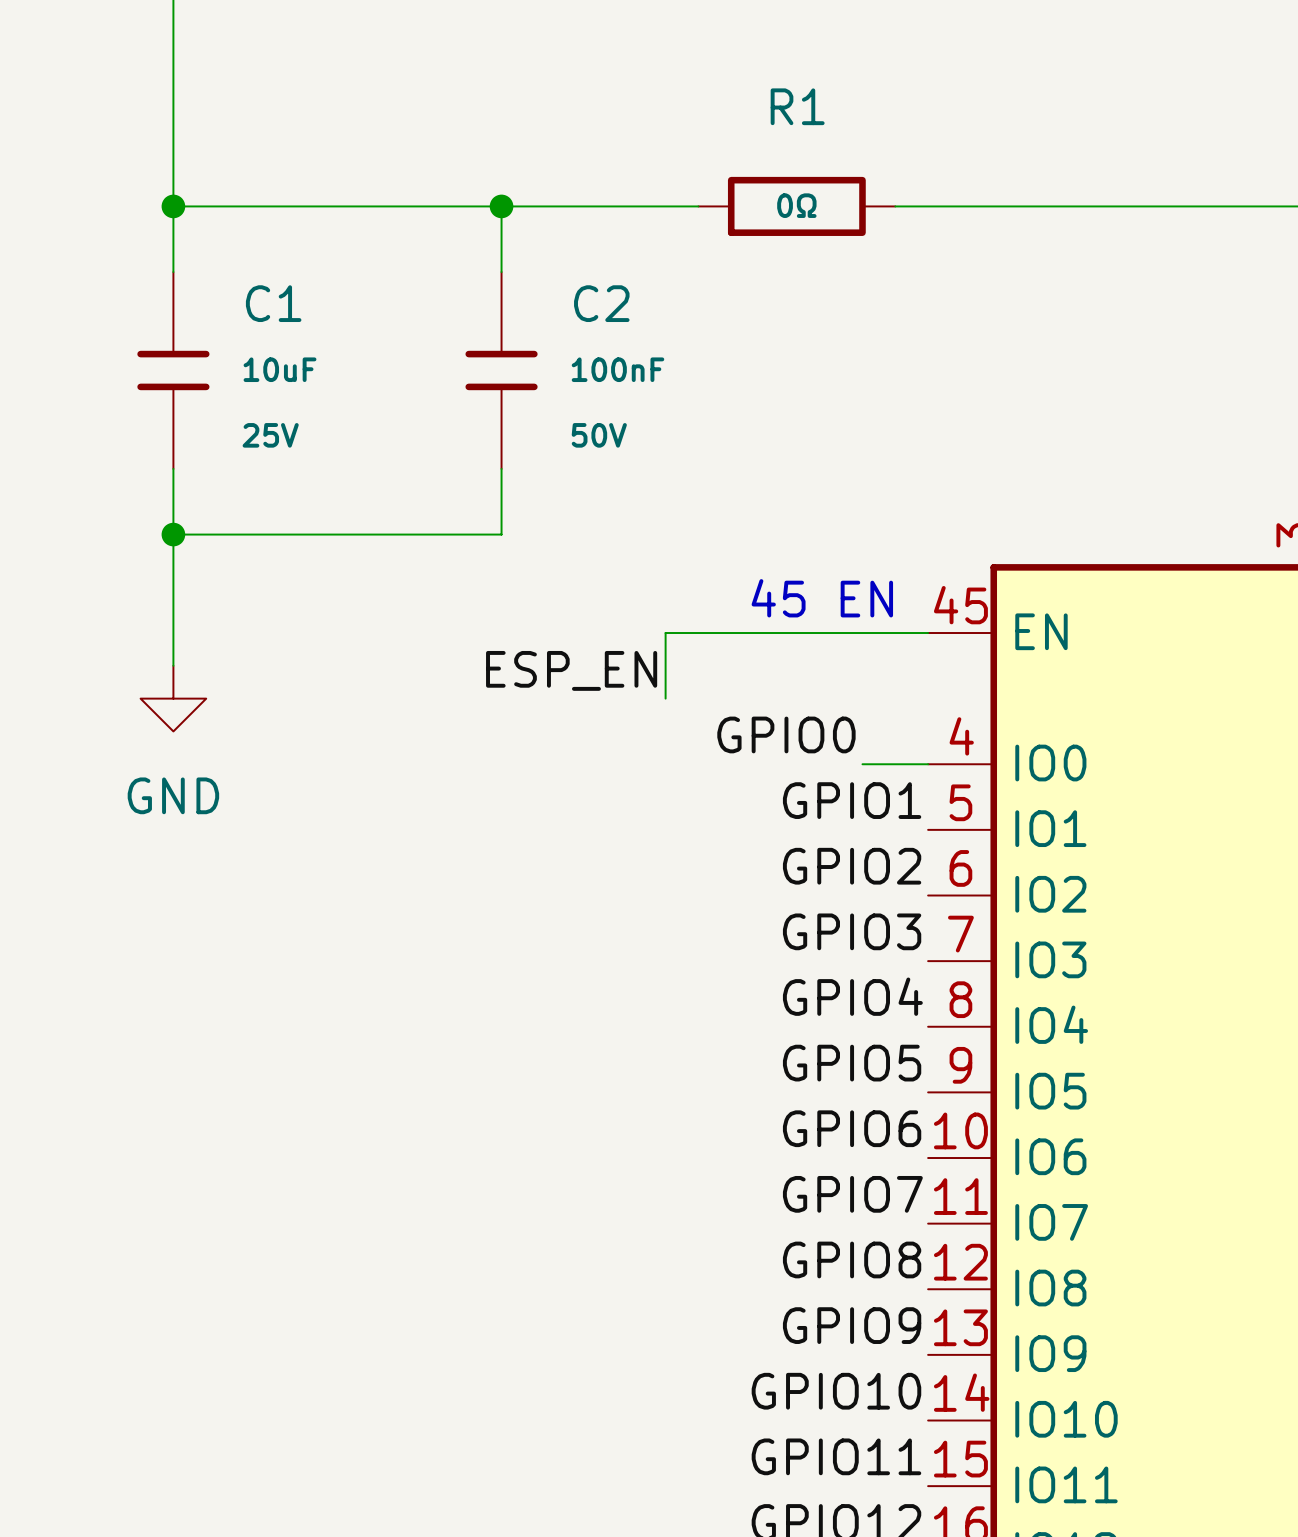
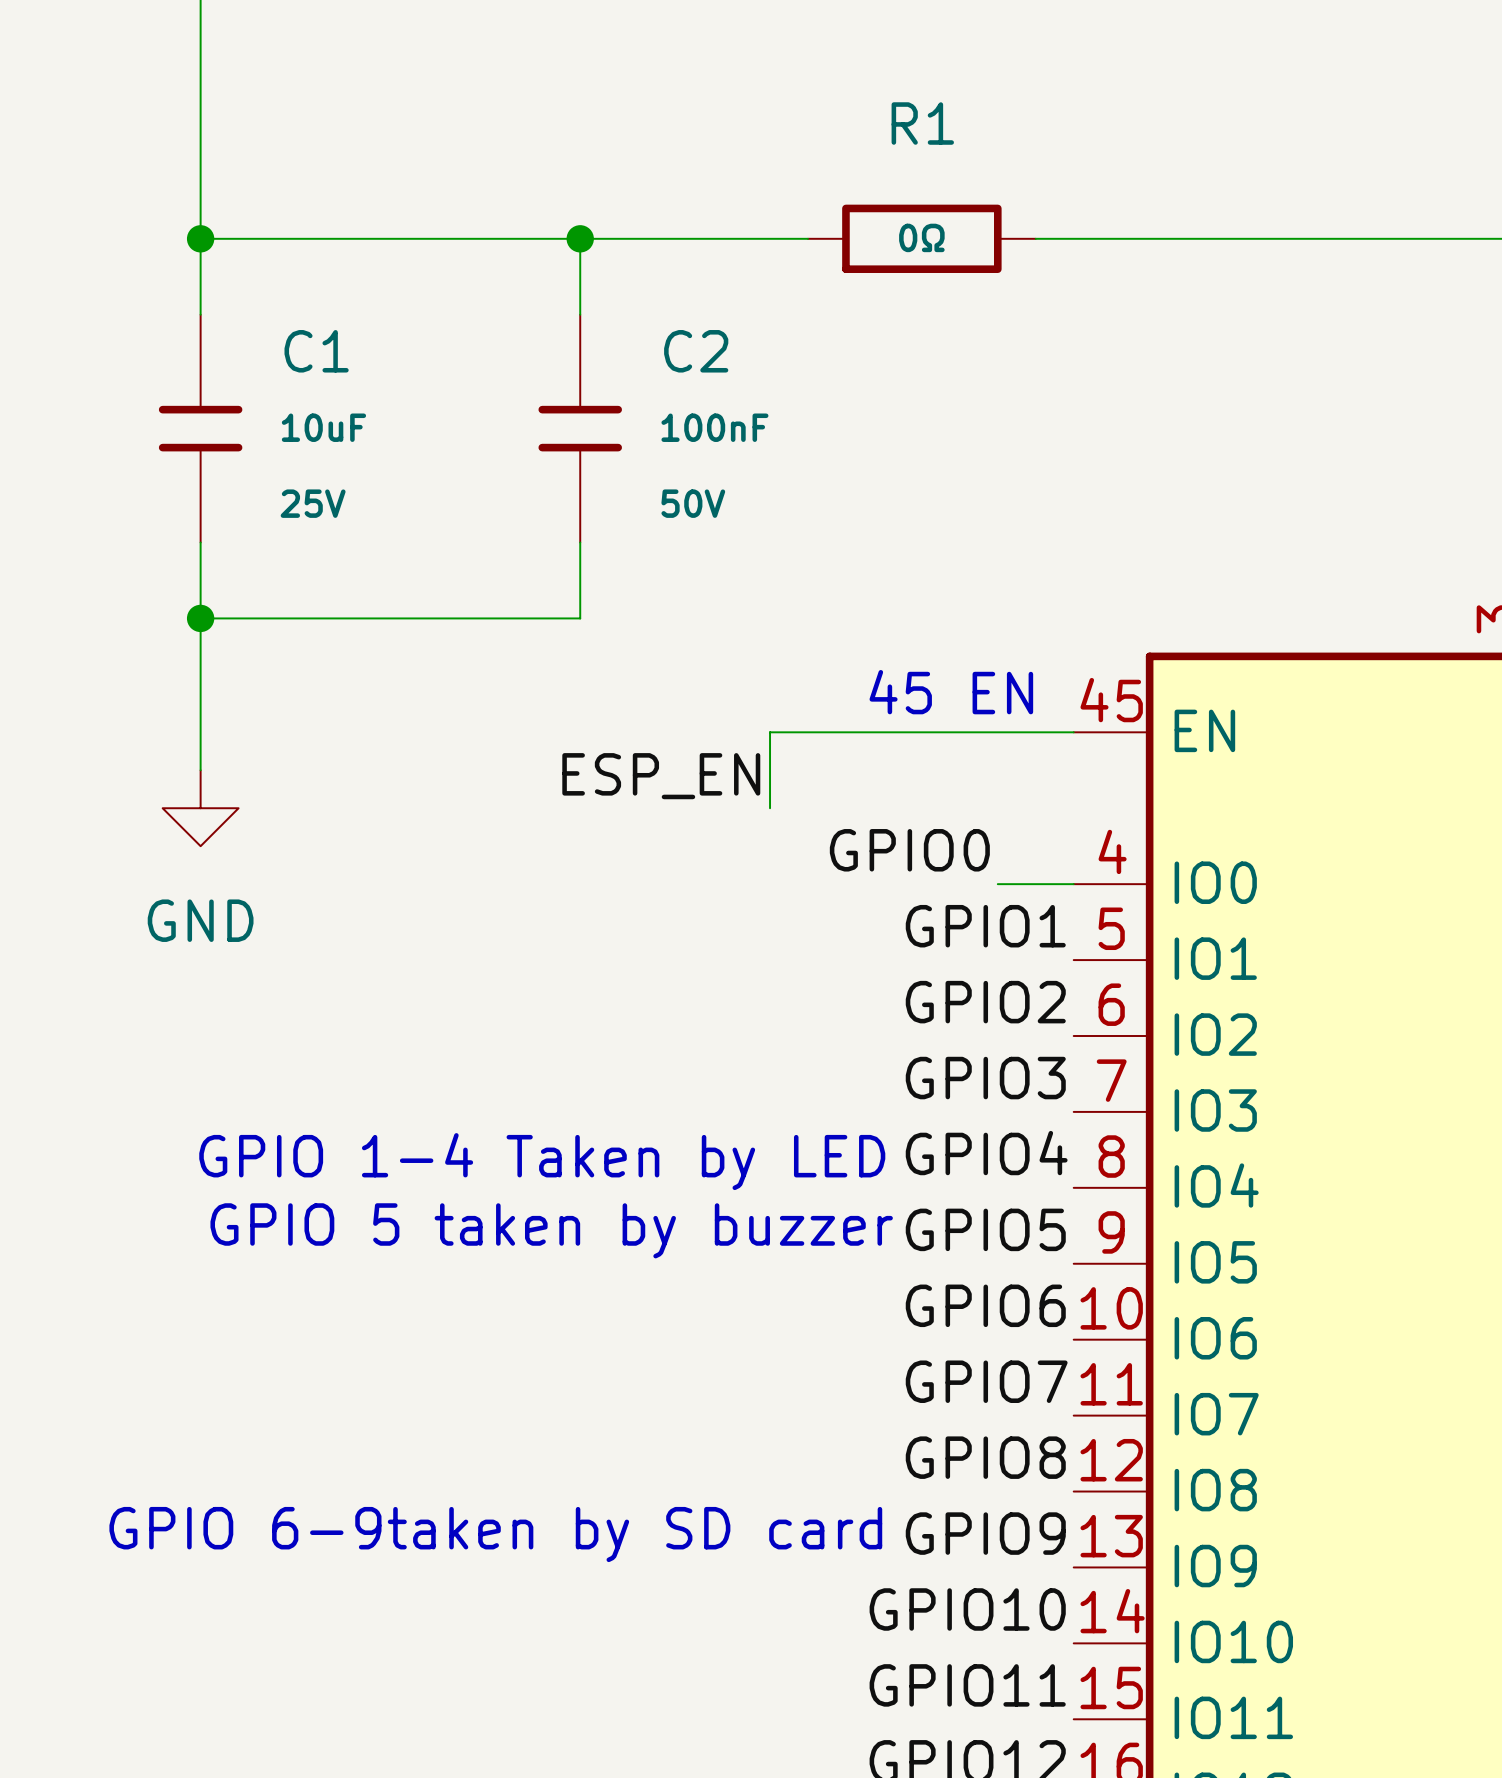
text: none -> GPIO 1-4 Taken by LED (542, 1161)
text: none -> GPIO 5 taken by buzzer (551, 1230)
text: none -> GPIO 6-9taken by SD card (495, 1534)

